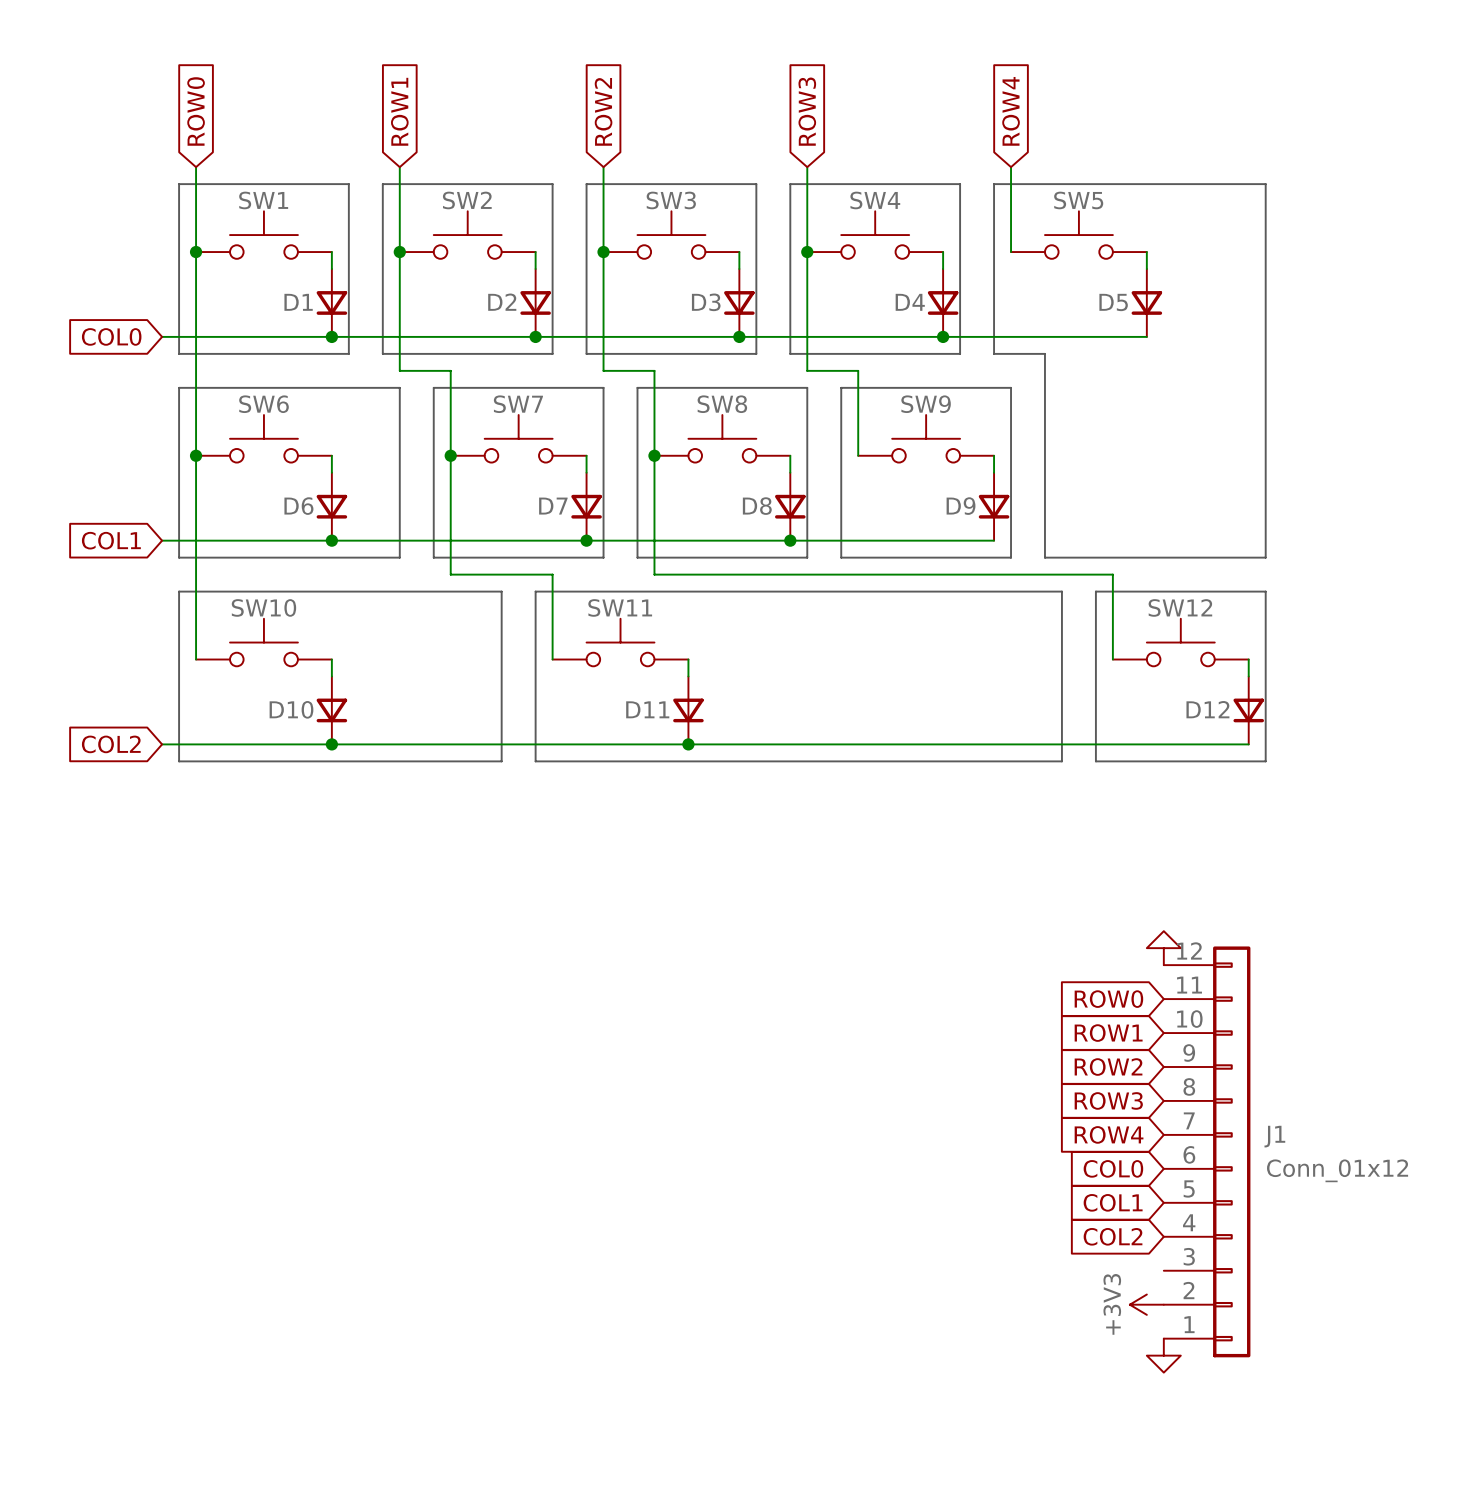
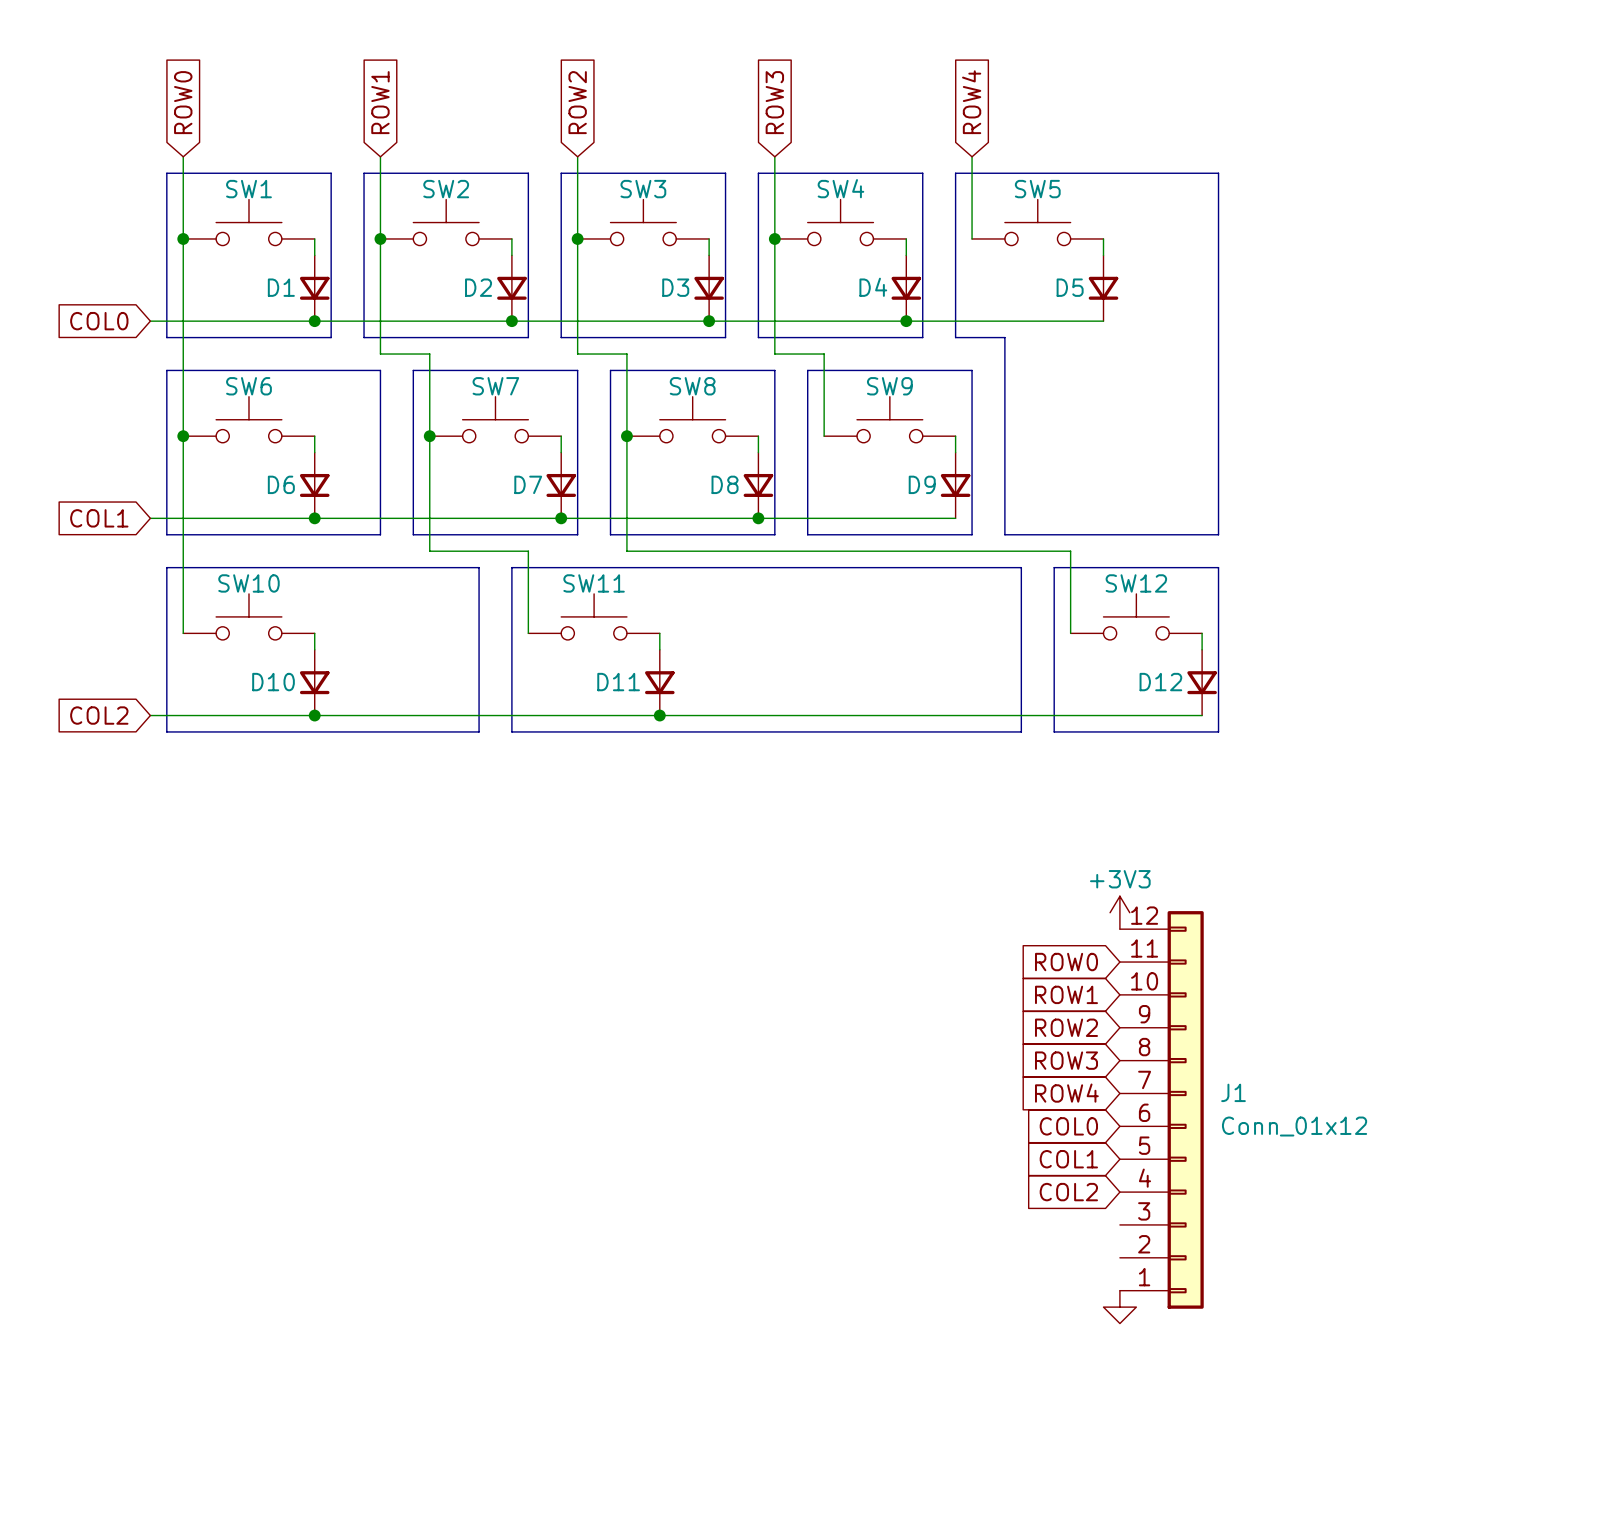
power symbol text: none -> +3V3 (1120, 879)
power symbol shape: [1146, 931, 1181, 966] -> [1110, 896, 1130, 930]
power symbol: +3V3 (1146, 1304) -> none

